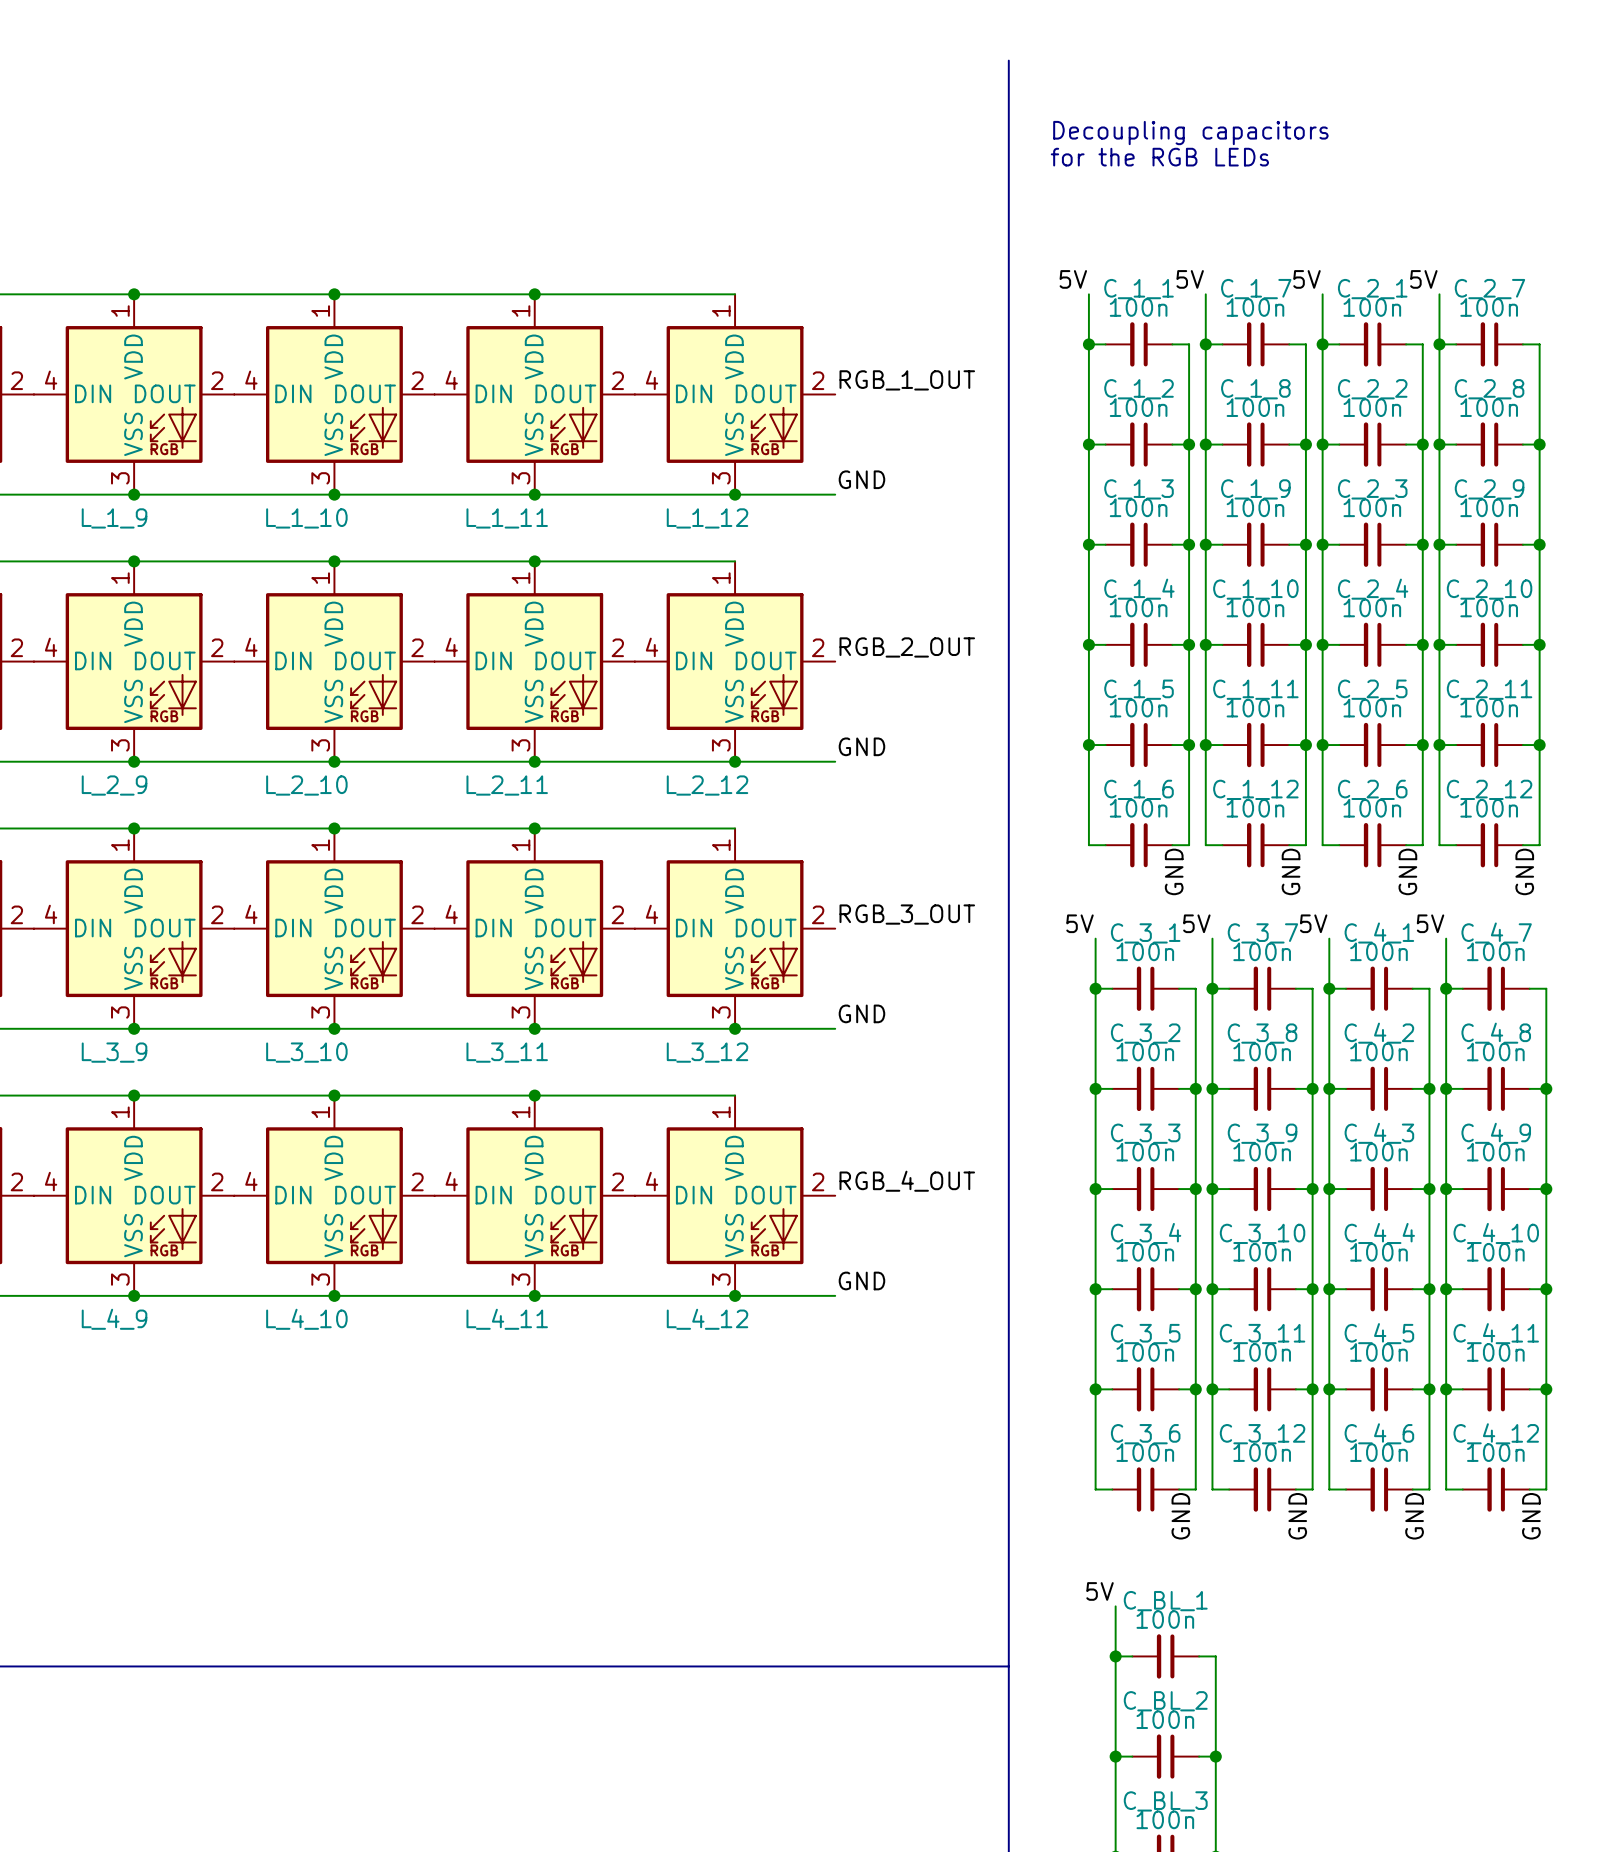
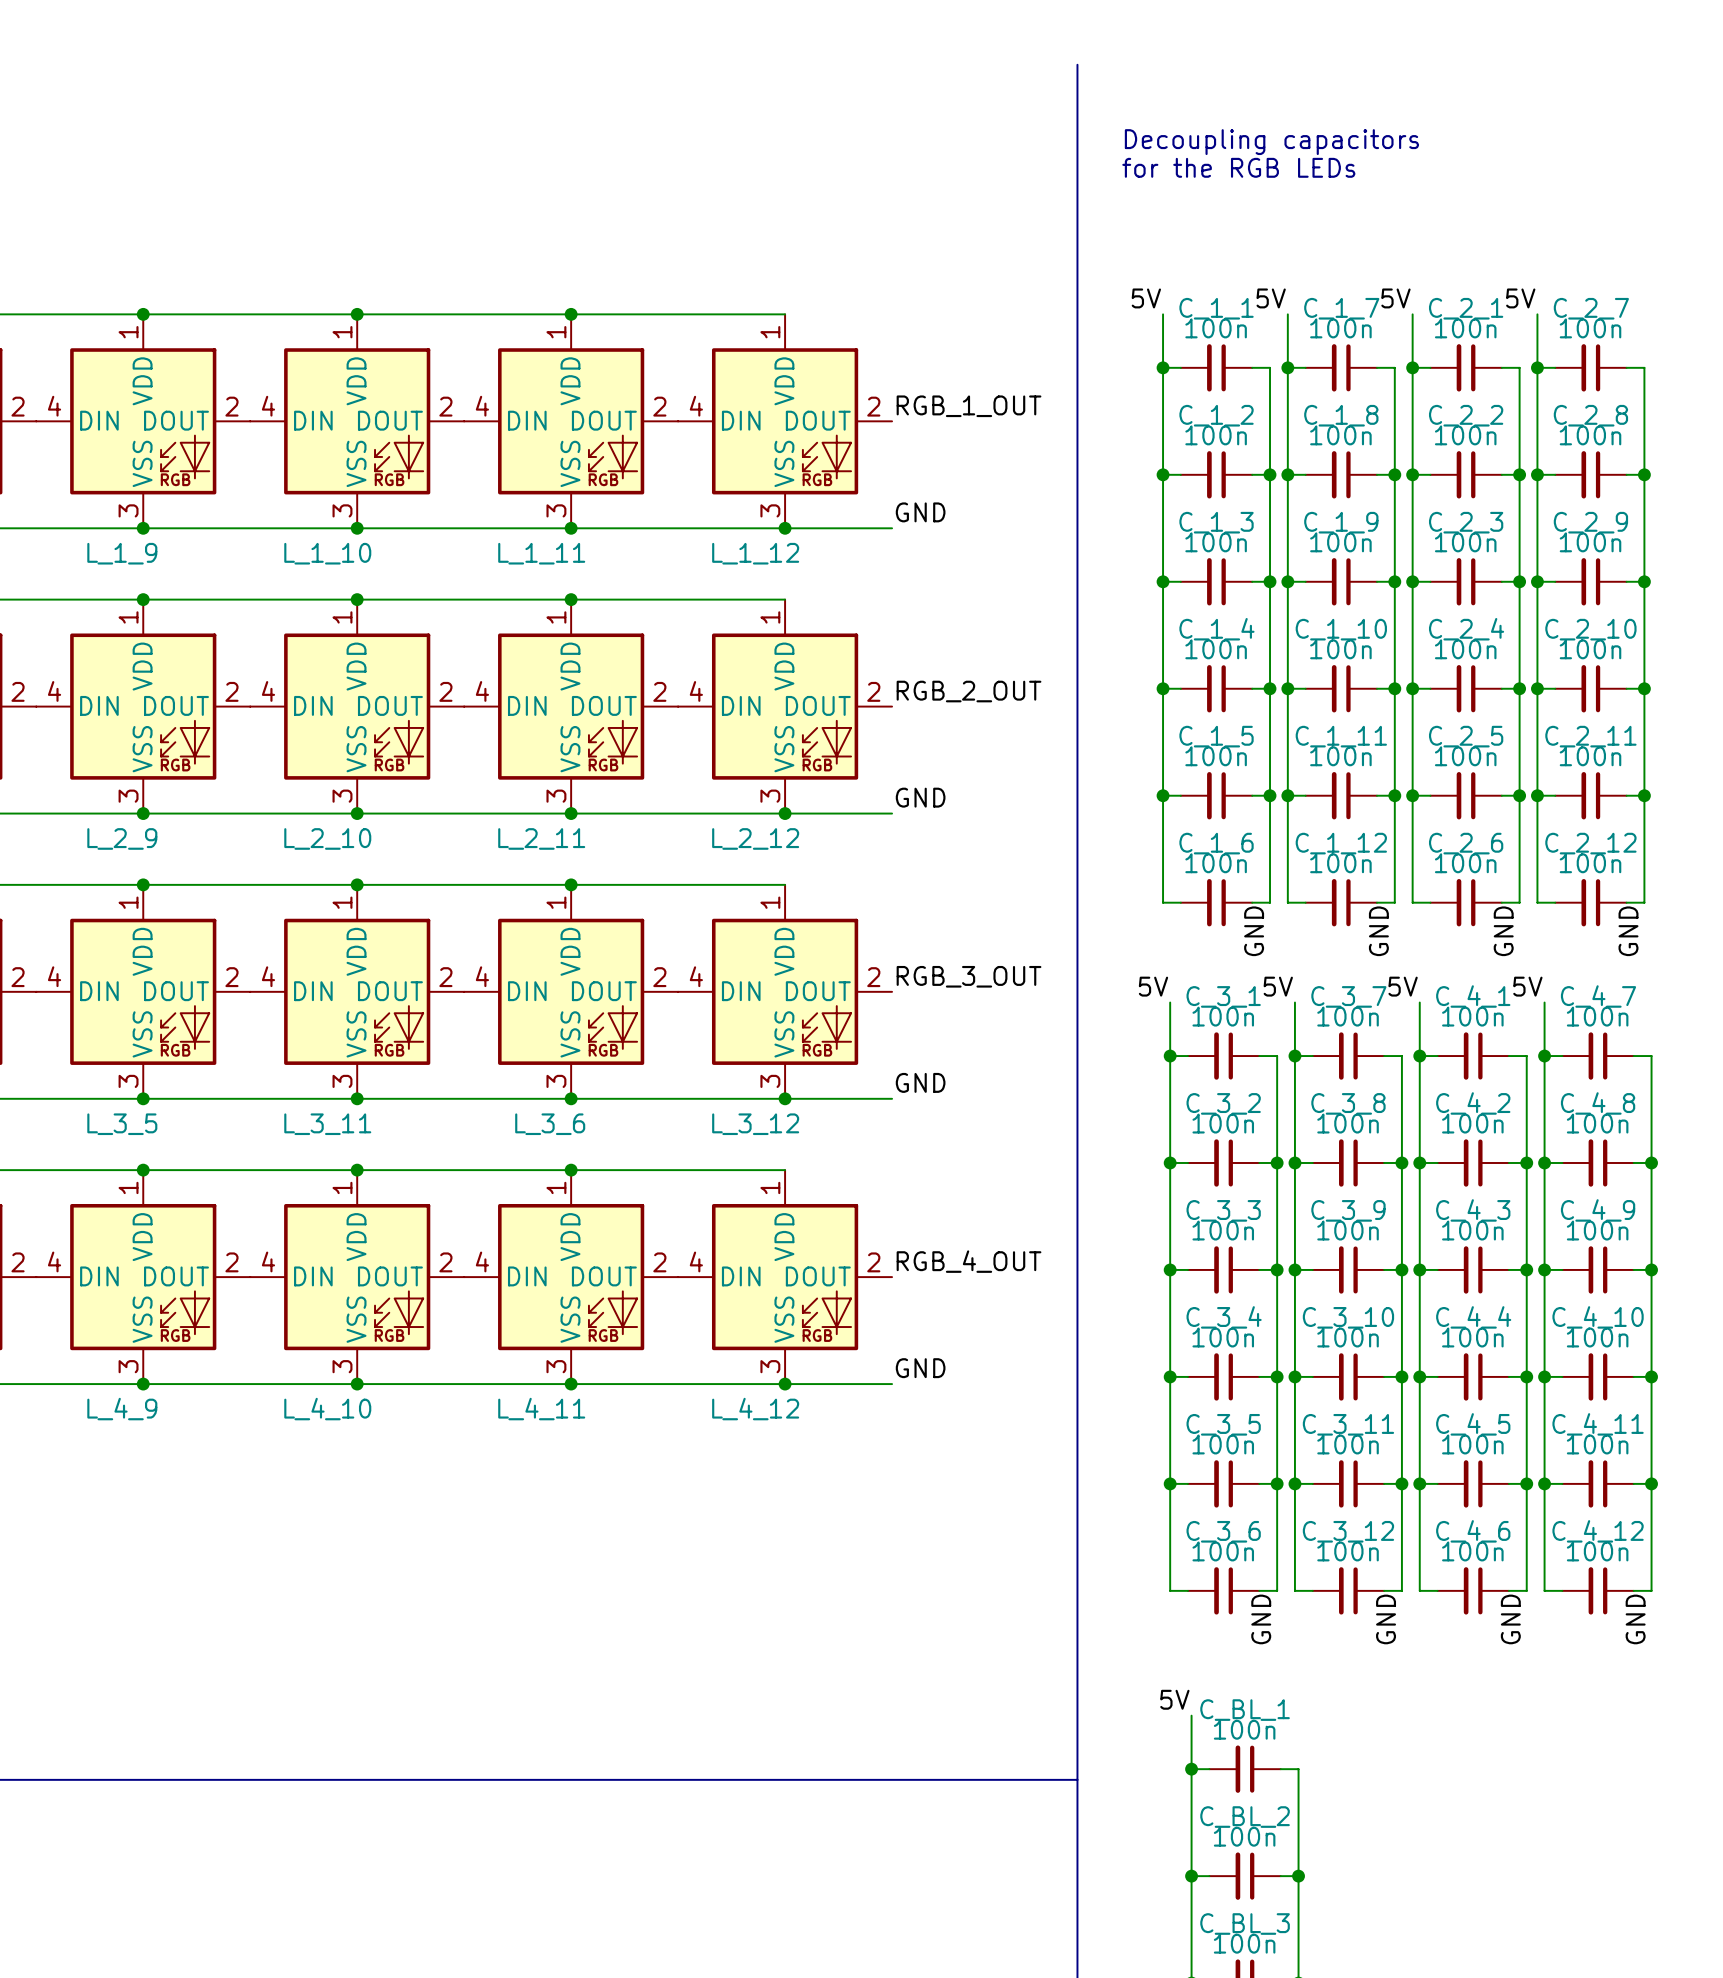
L_3_9 name: L_3_9 (114, 1052) -> L_3_5 (122, 1124)
L_3_10 name: L_3_10 (306, 1052) -> L_3_11 (327, 1124)
L_3_11 name: L_3_11 (507, 1052) -> L_3_6 (550, 1124)

